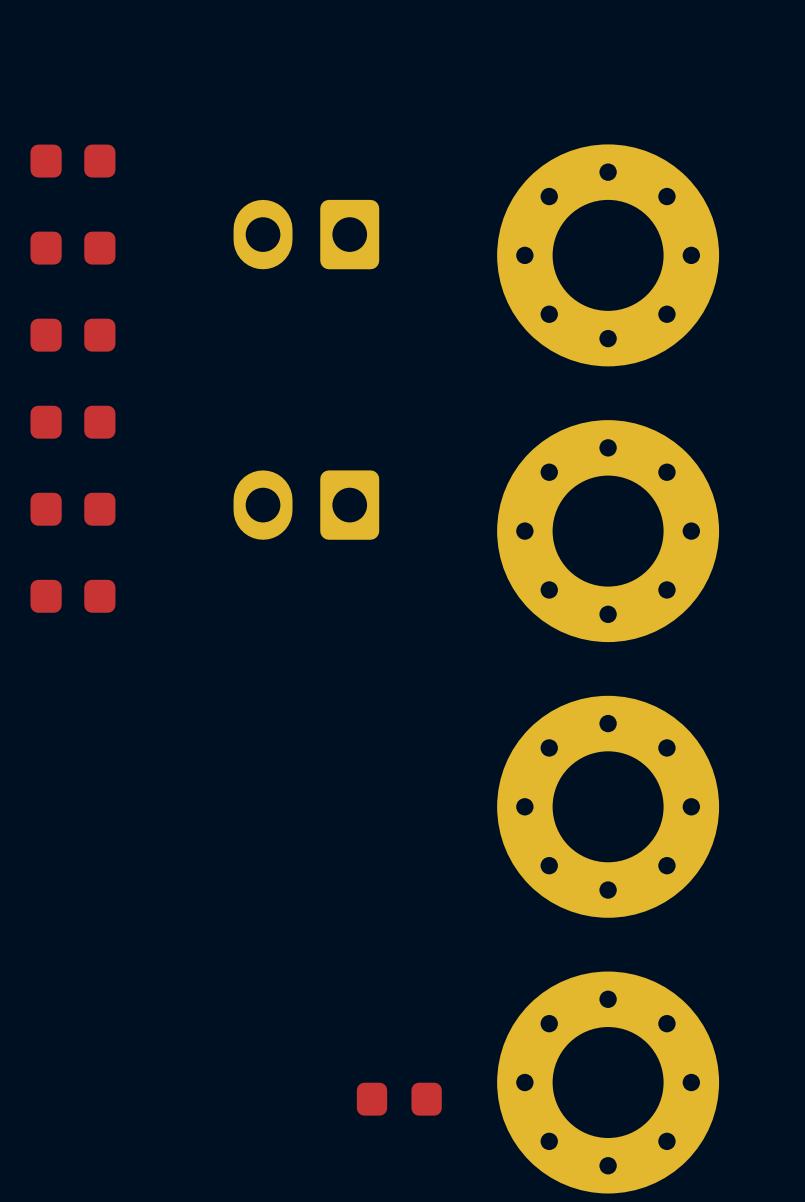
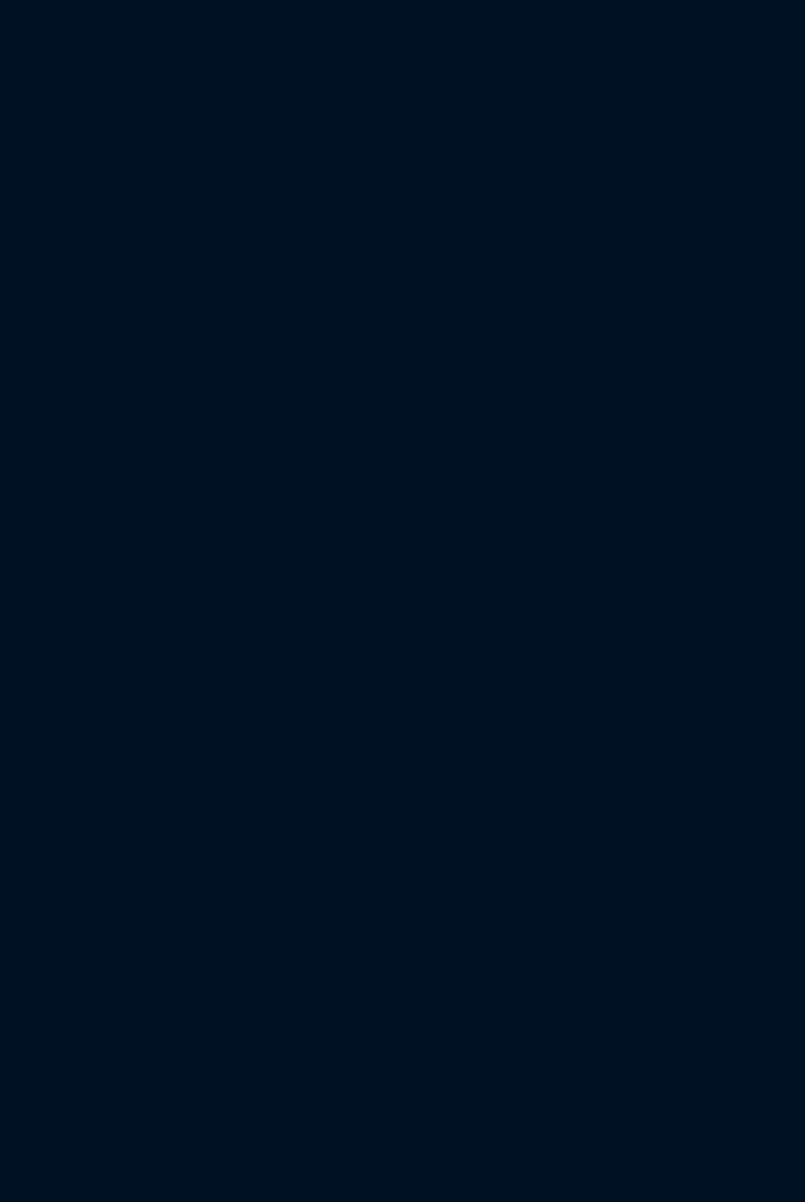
part: (72, 161) -> none
part: (306, 234) -> none
part: (72, 248) -> none
part: (608, 255) -> none
part: (72, 335) -> none
part: (72, 422) -> none
part: (306, 505) -> none
part: (72, 509) -> none
part: (608, 531) -> none
part: (72, 596) -> none
part: (608, 806) -> none
part: (608, 1082) -> none
part: (399, 1099) -> none

